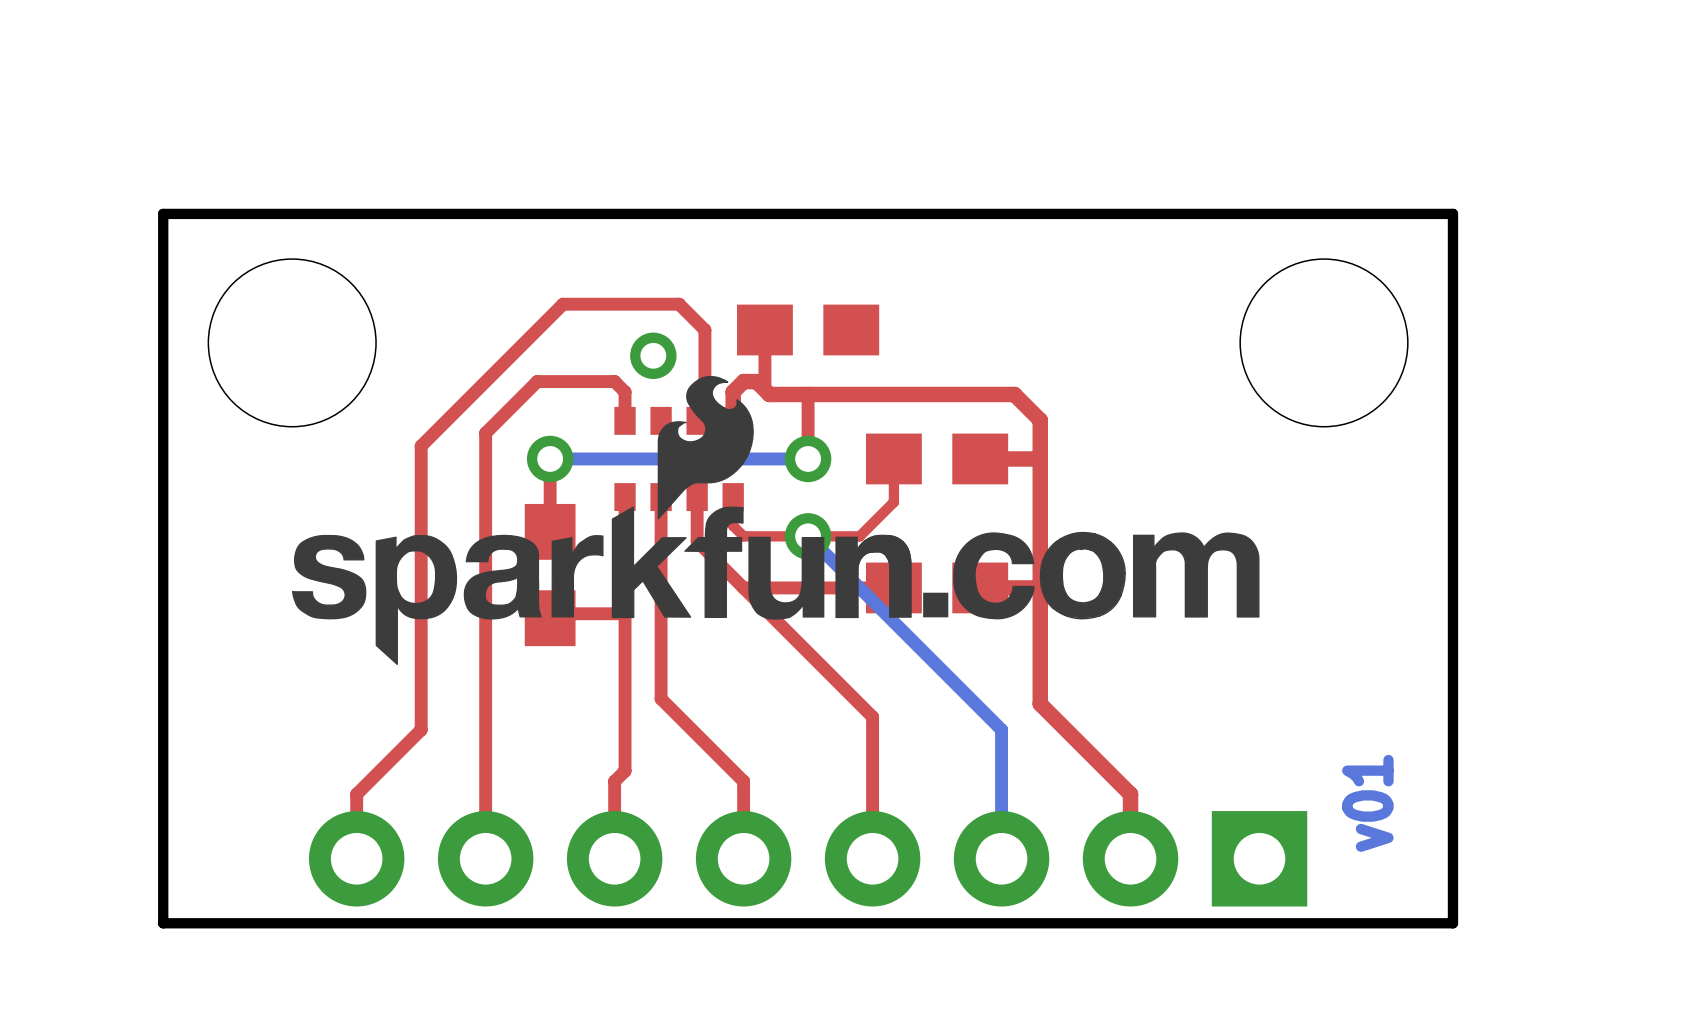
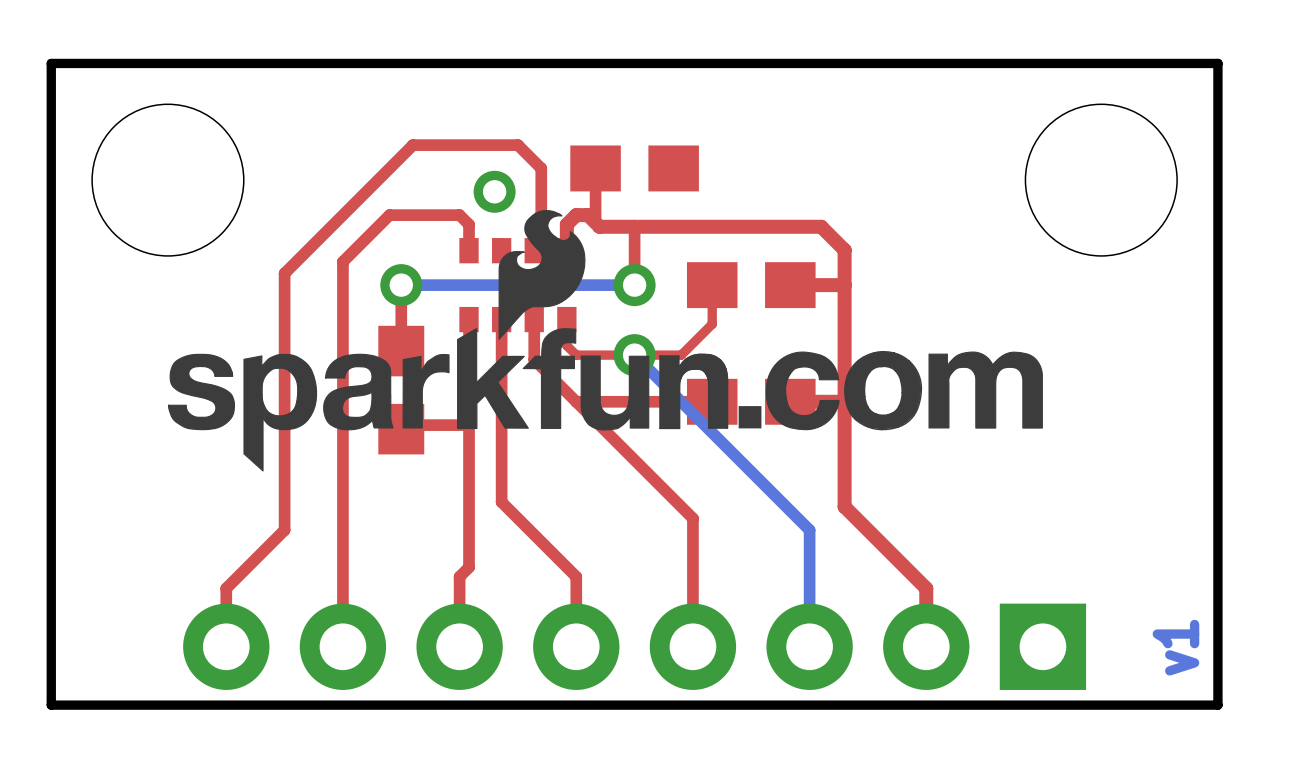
text: v01 (1367, 803) -> v1 (1175, 647)

